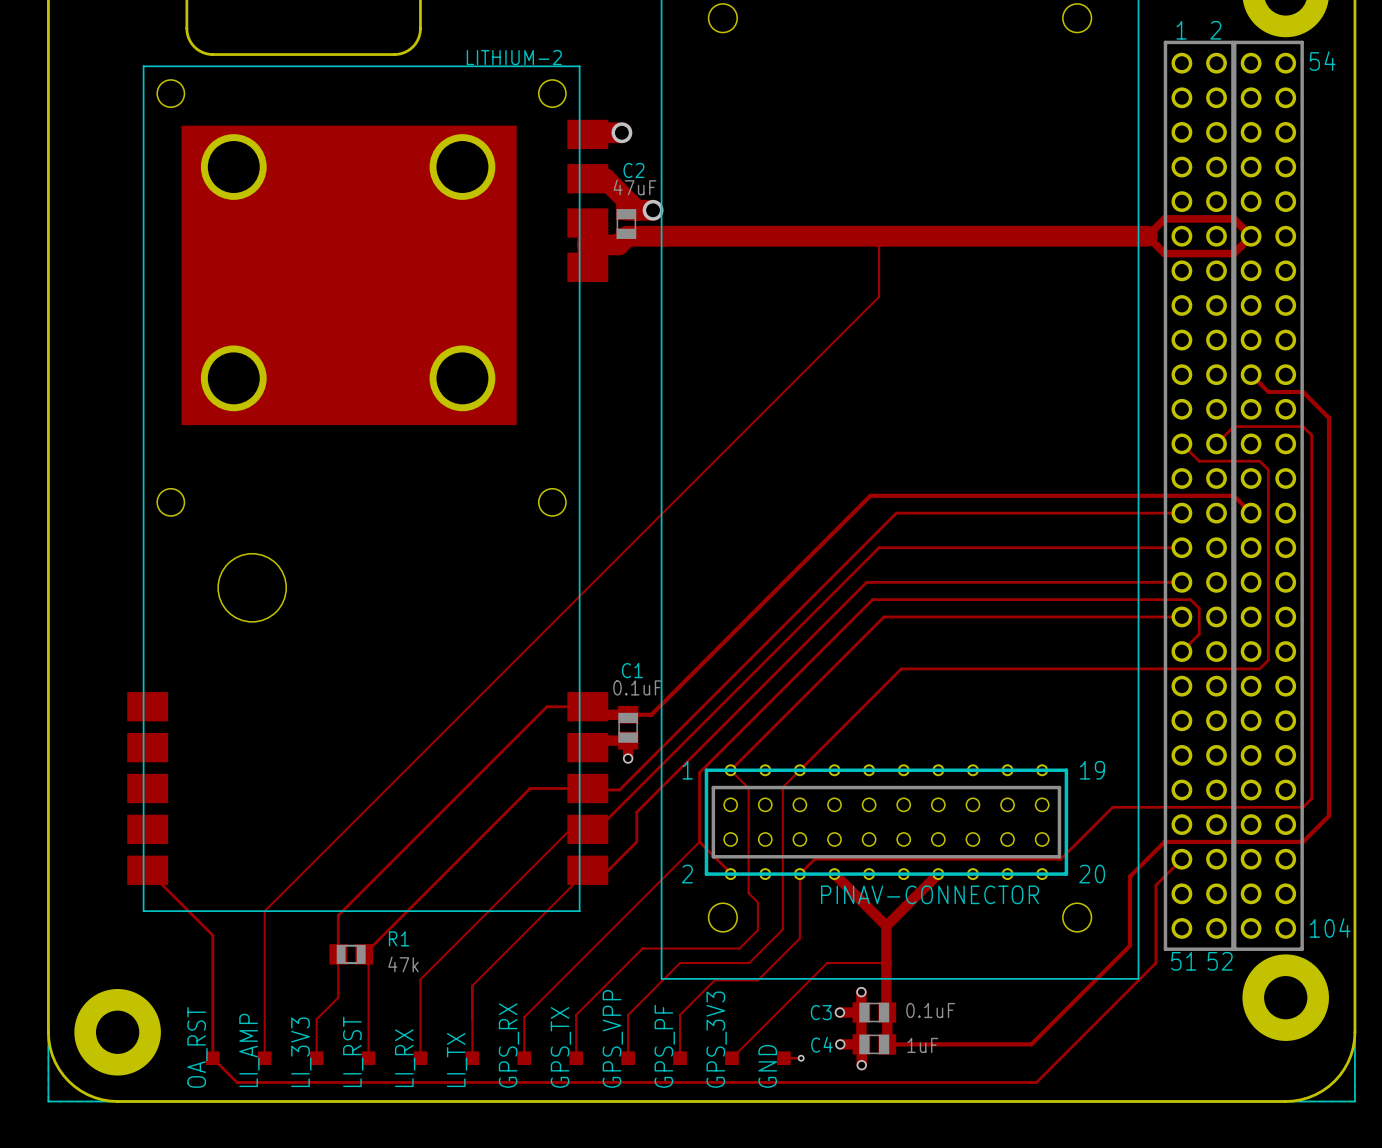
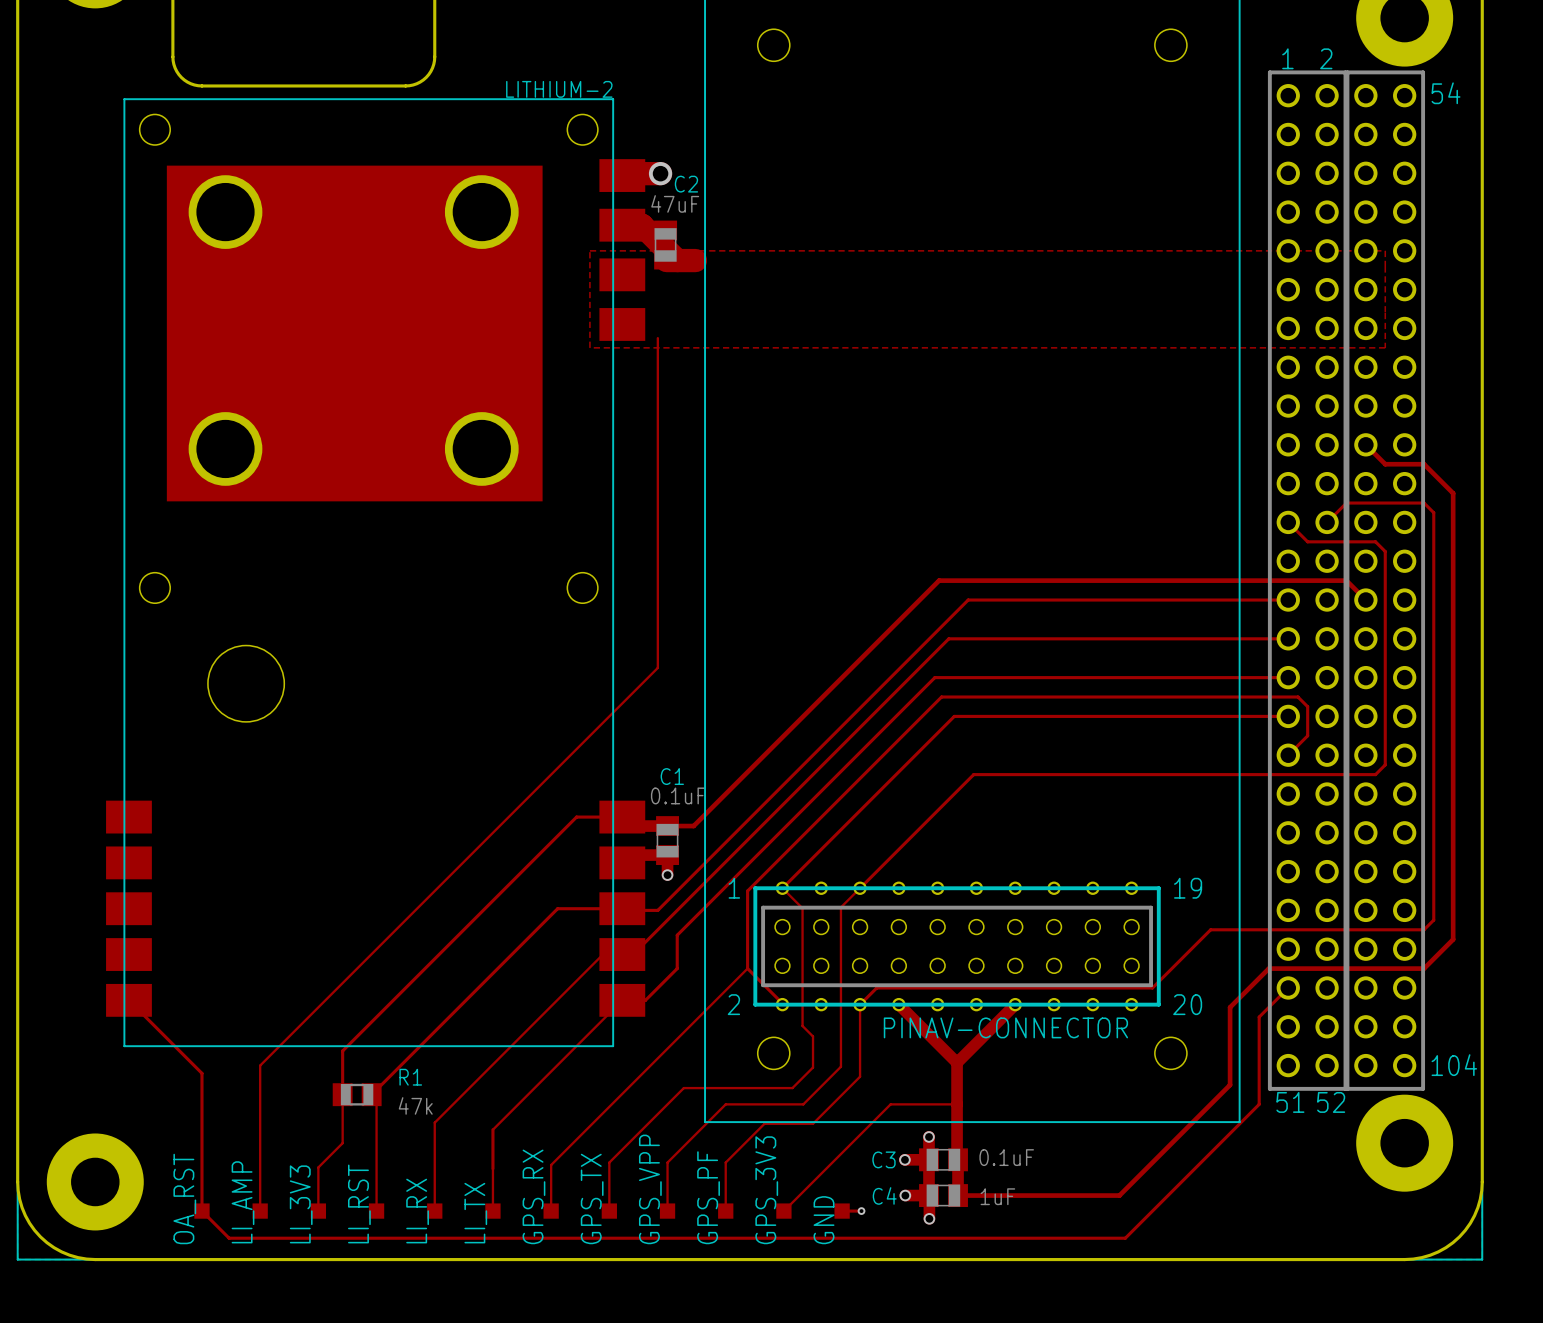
LITHIUM-2 name position: LITHIUM-2 (514, 57) -> LITHIUM-2 (559, 89)
C2 name position: C2 (633, 170) -> C2 (686, 184)
top zone outline: none -> (589, 250) (589, 347) (1385, 347) (1385, 250) (589, 250)
via: (653, 210) -> none
C2 position: (626, 224) -> (665, 245)
top track: (879, 236) (879, 296) (264, 911) (264, 928) -> (657, 338) (657, 667) (260, 1065)
top track: (1147, 236) (1164, 218) (1233, 218) (1251, 236) (1233, 253) (1164, 253) (1147, 236) -> none
top track: (1147, 236) (627, 236) (618, 244) (587, 244) -> none

